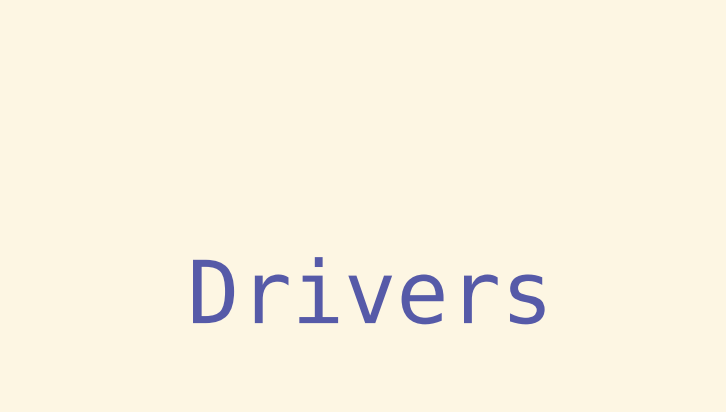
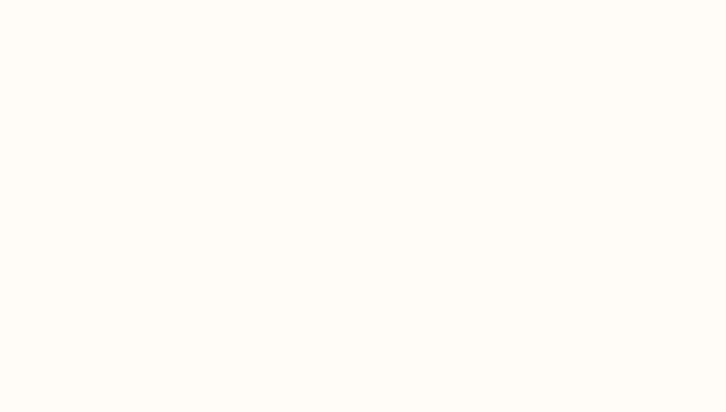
text: Drivers (368, 290) -> none

